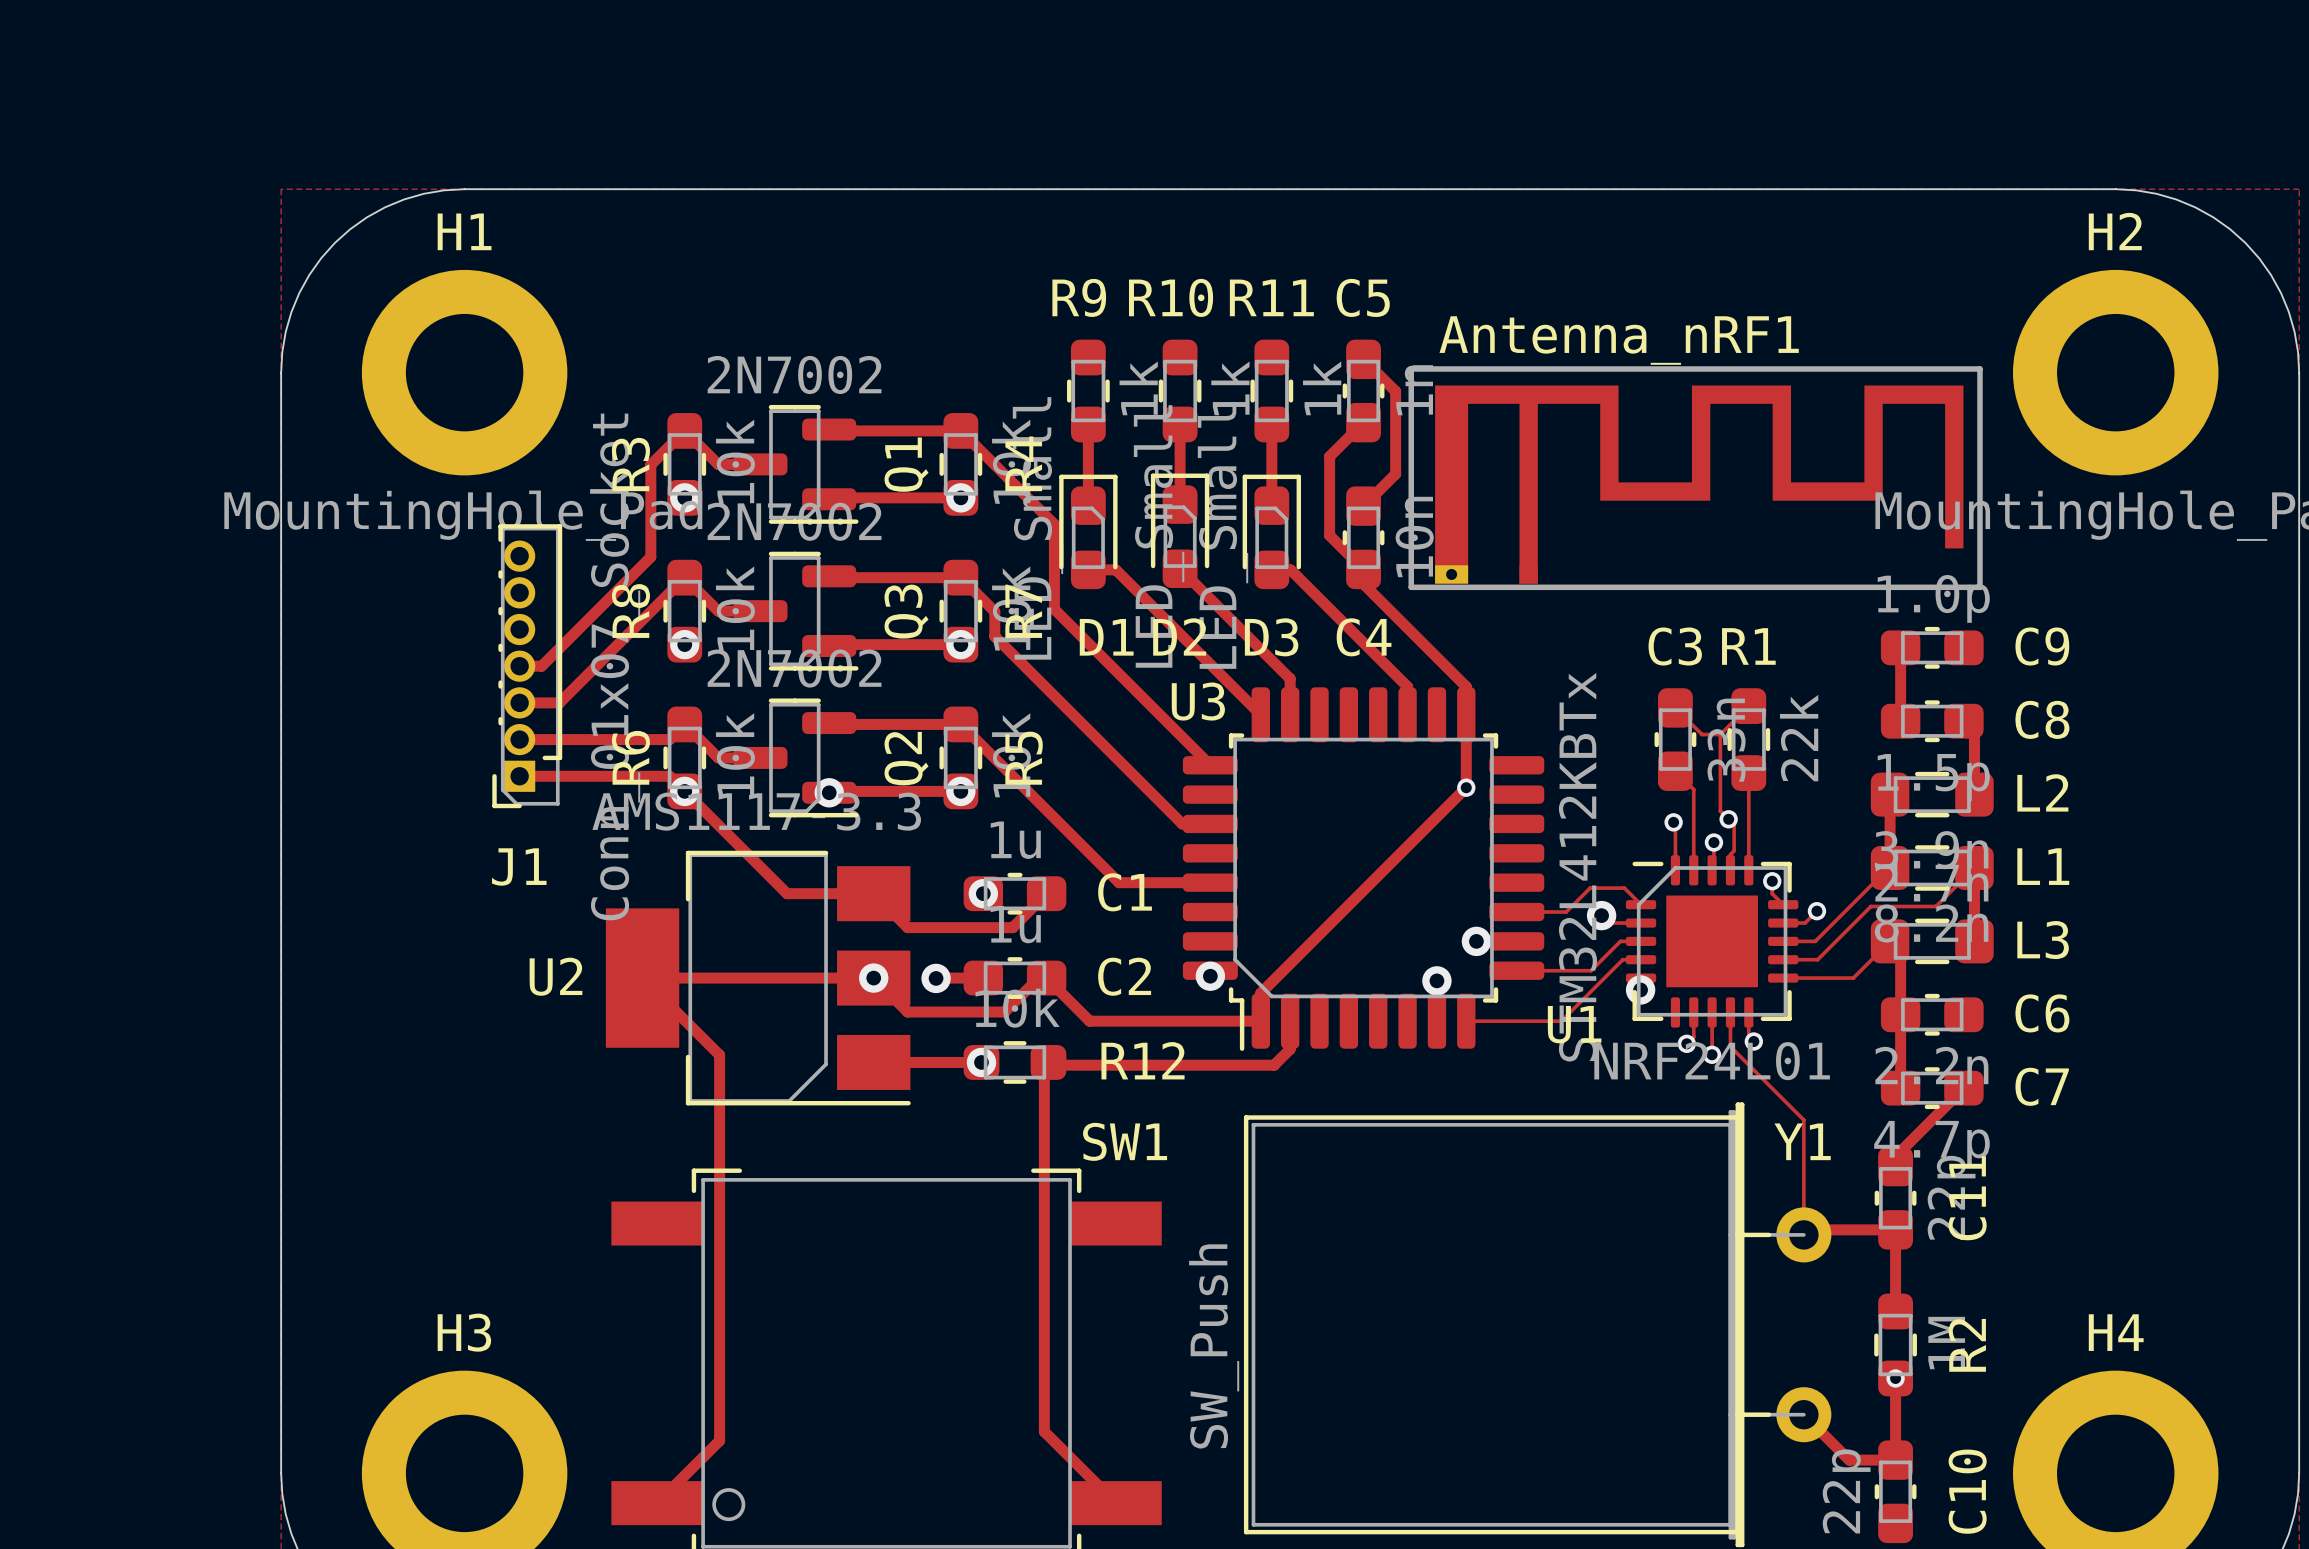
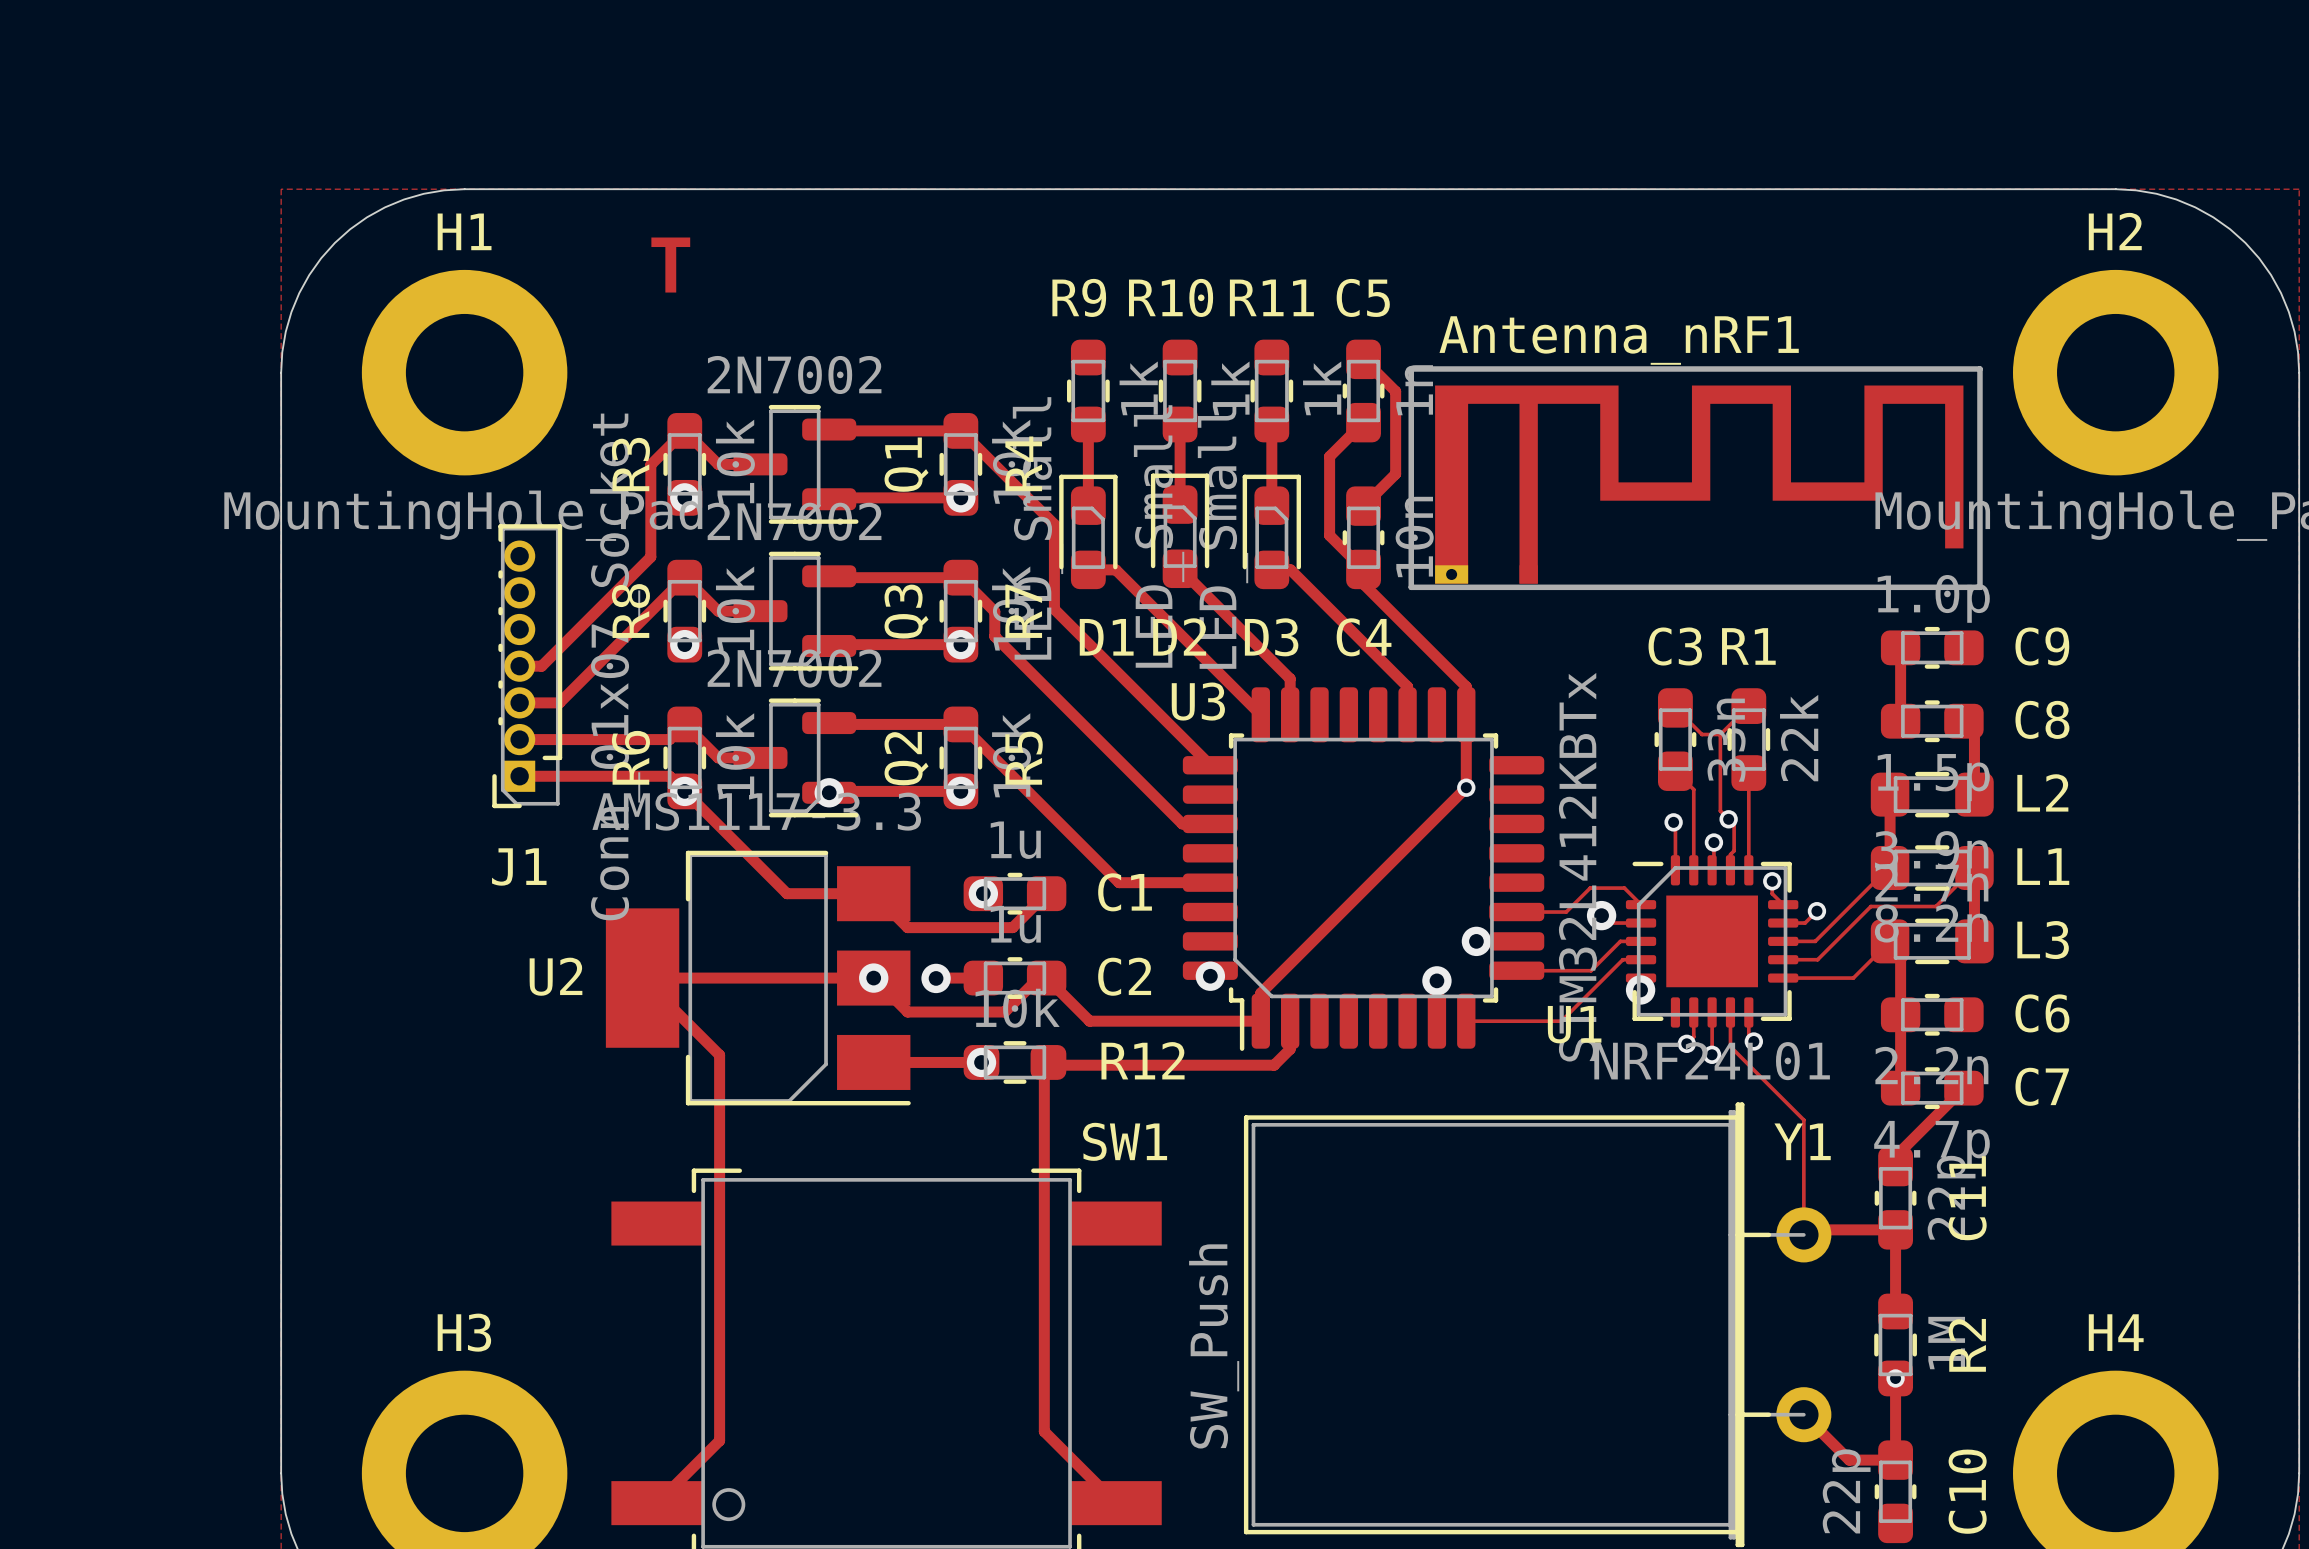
text: none -> T (670, 265)

